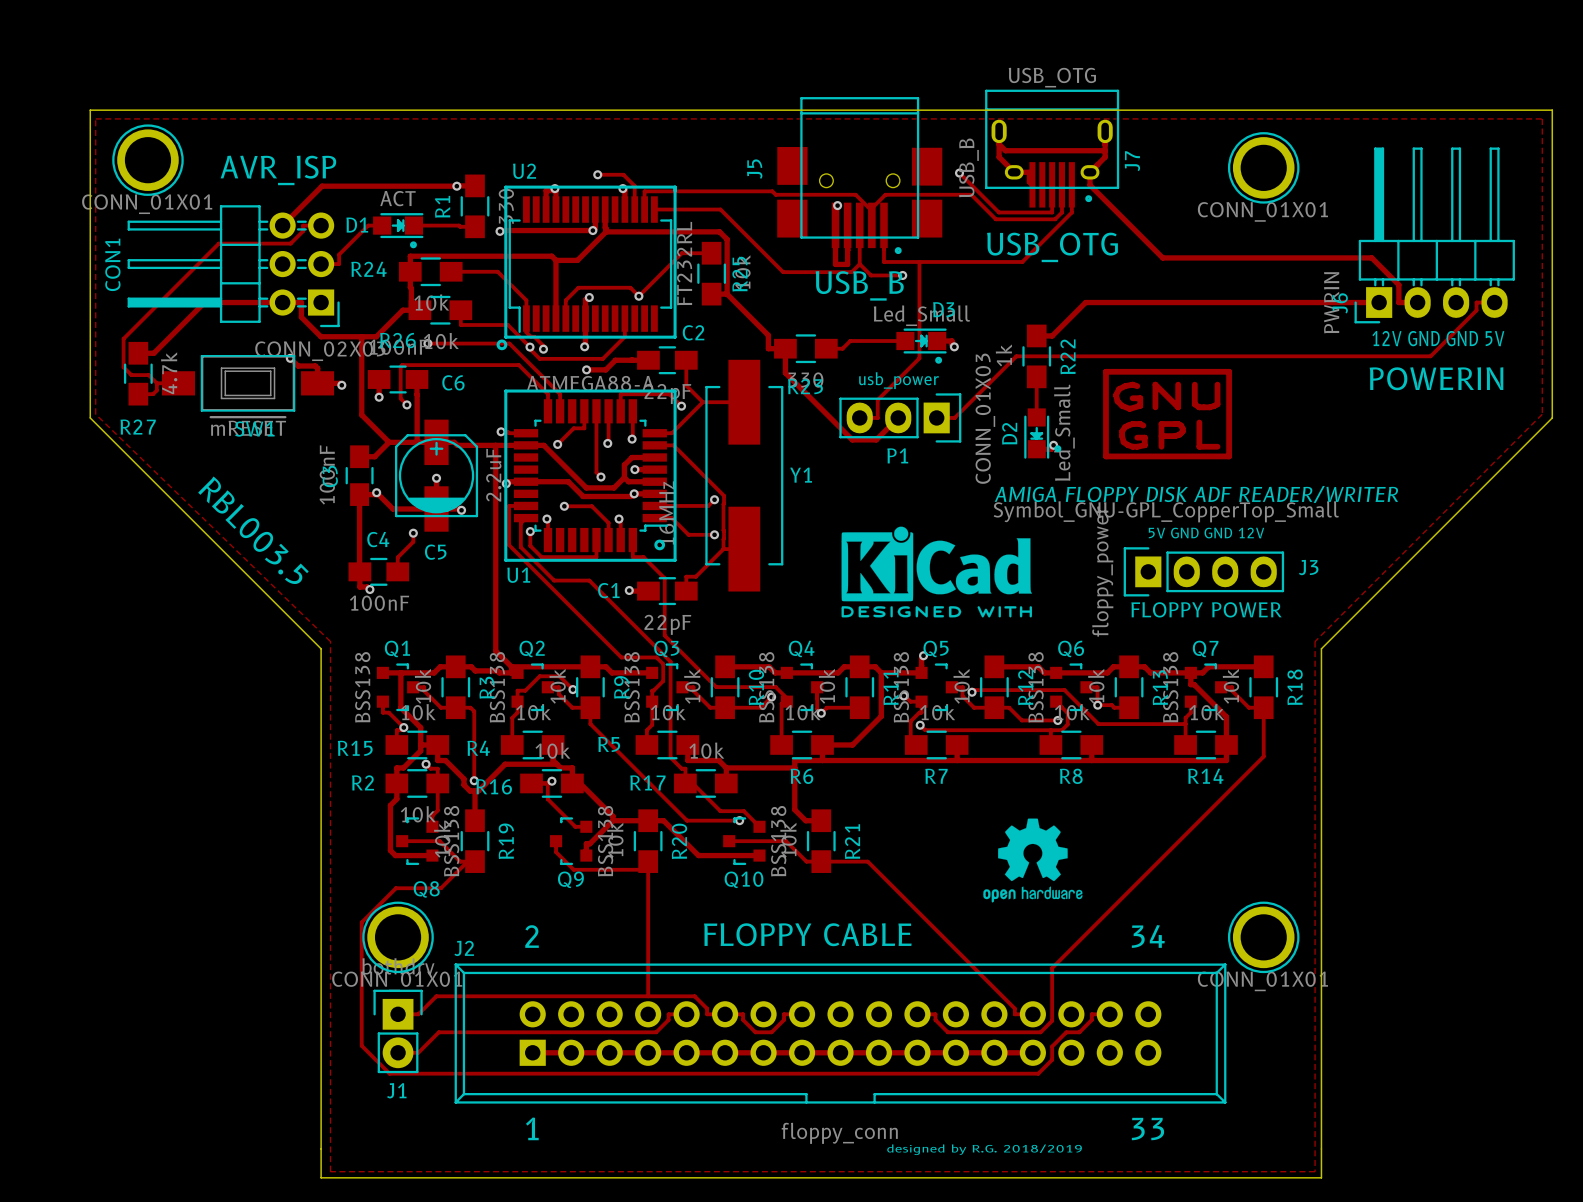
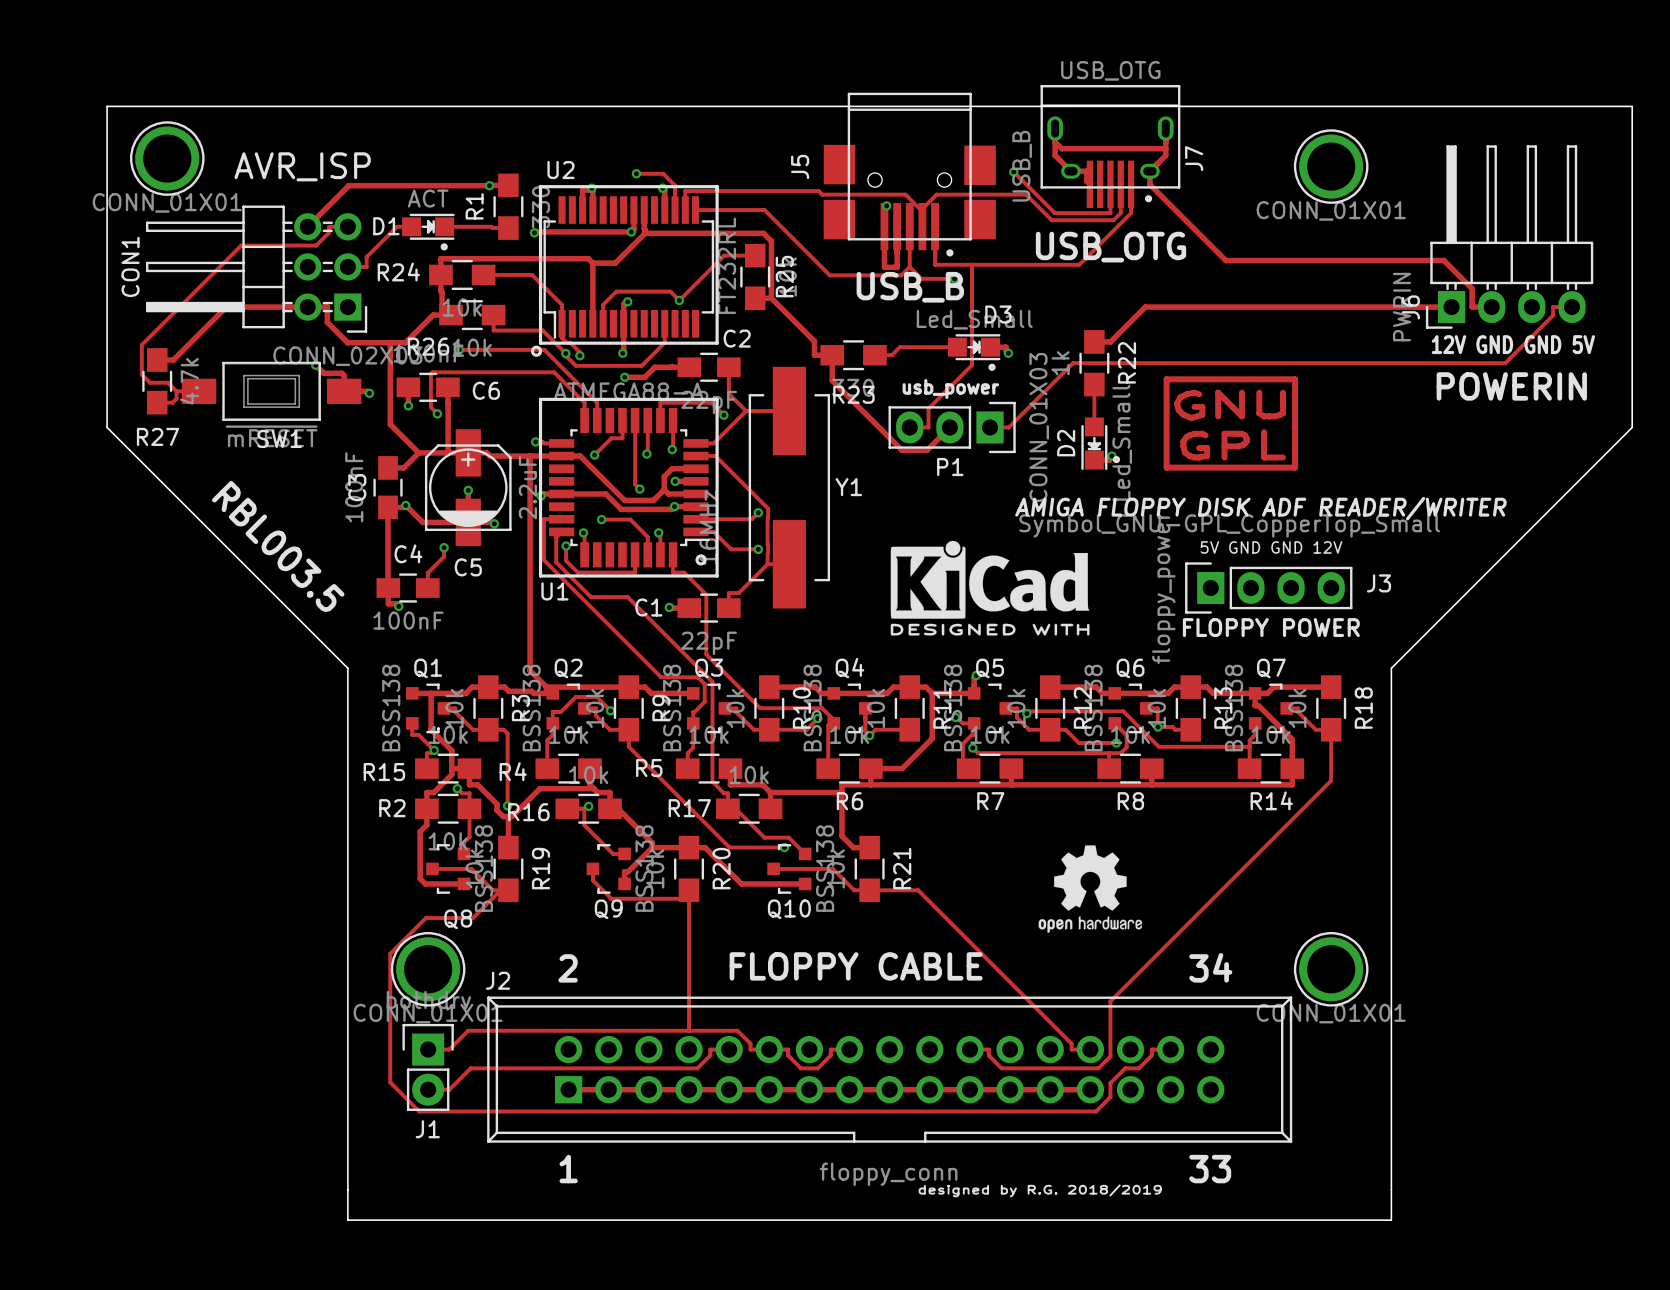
zone outline: (95, 118) (95, 414) (330, 641) (330, 1171) (1315, 1171) (1315, 641) (1542, 414) (1542, 118) (95, 118) -> none

